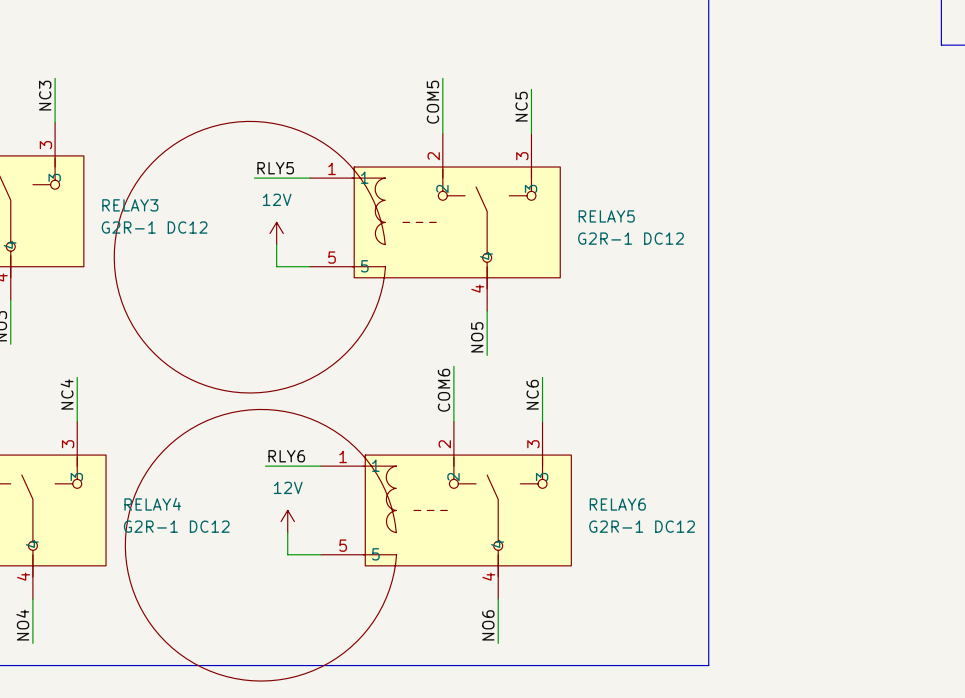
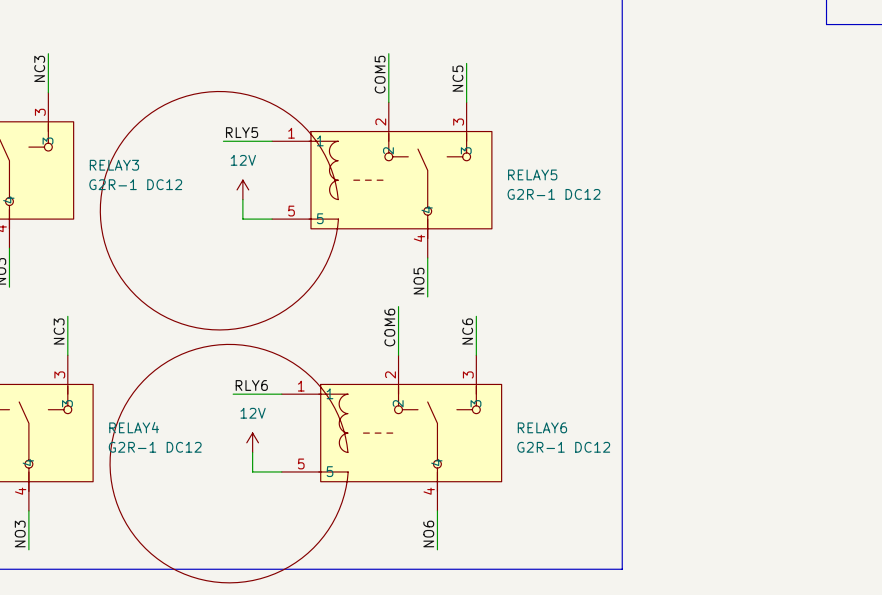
label: NC4 (67, 394) -> NC3 (59, 331)
label: NO4 (22, 625) -> NO3 (20, 533)

